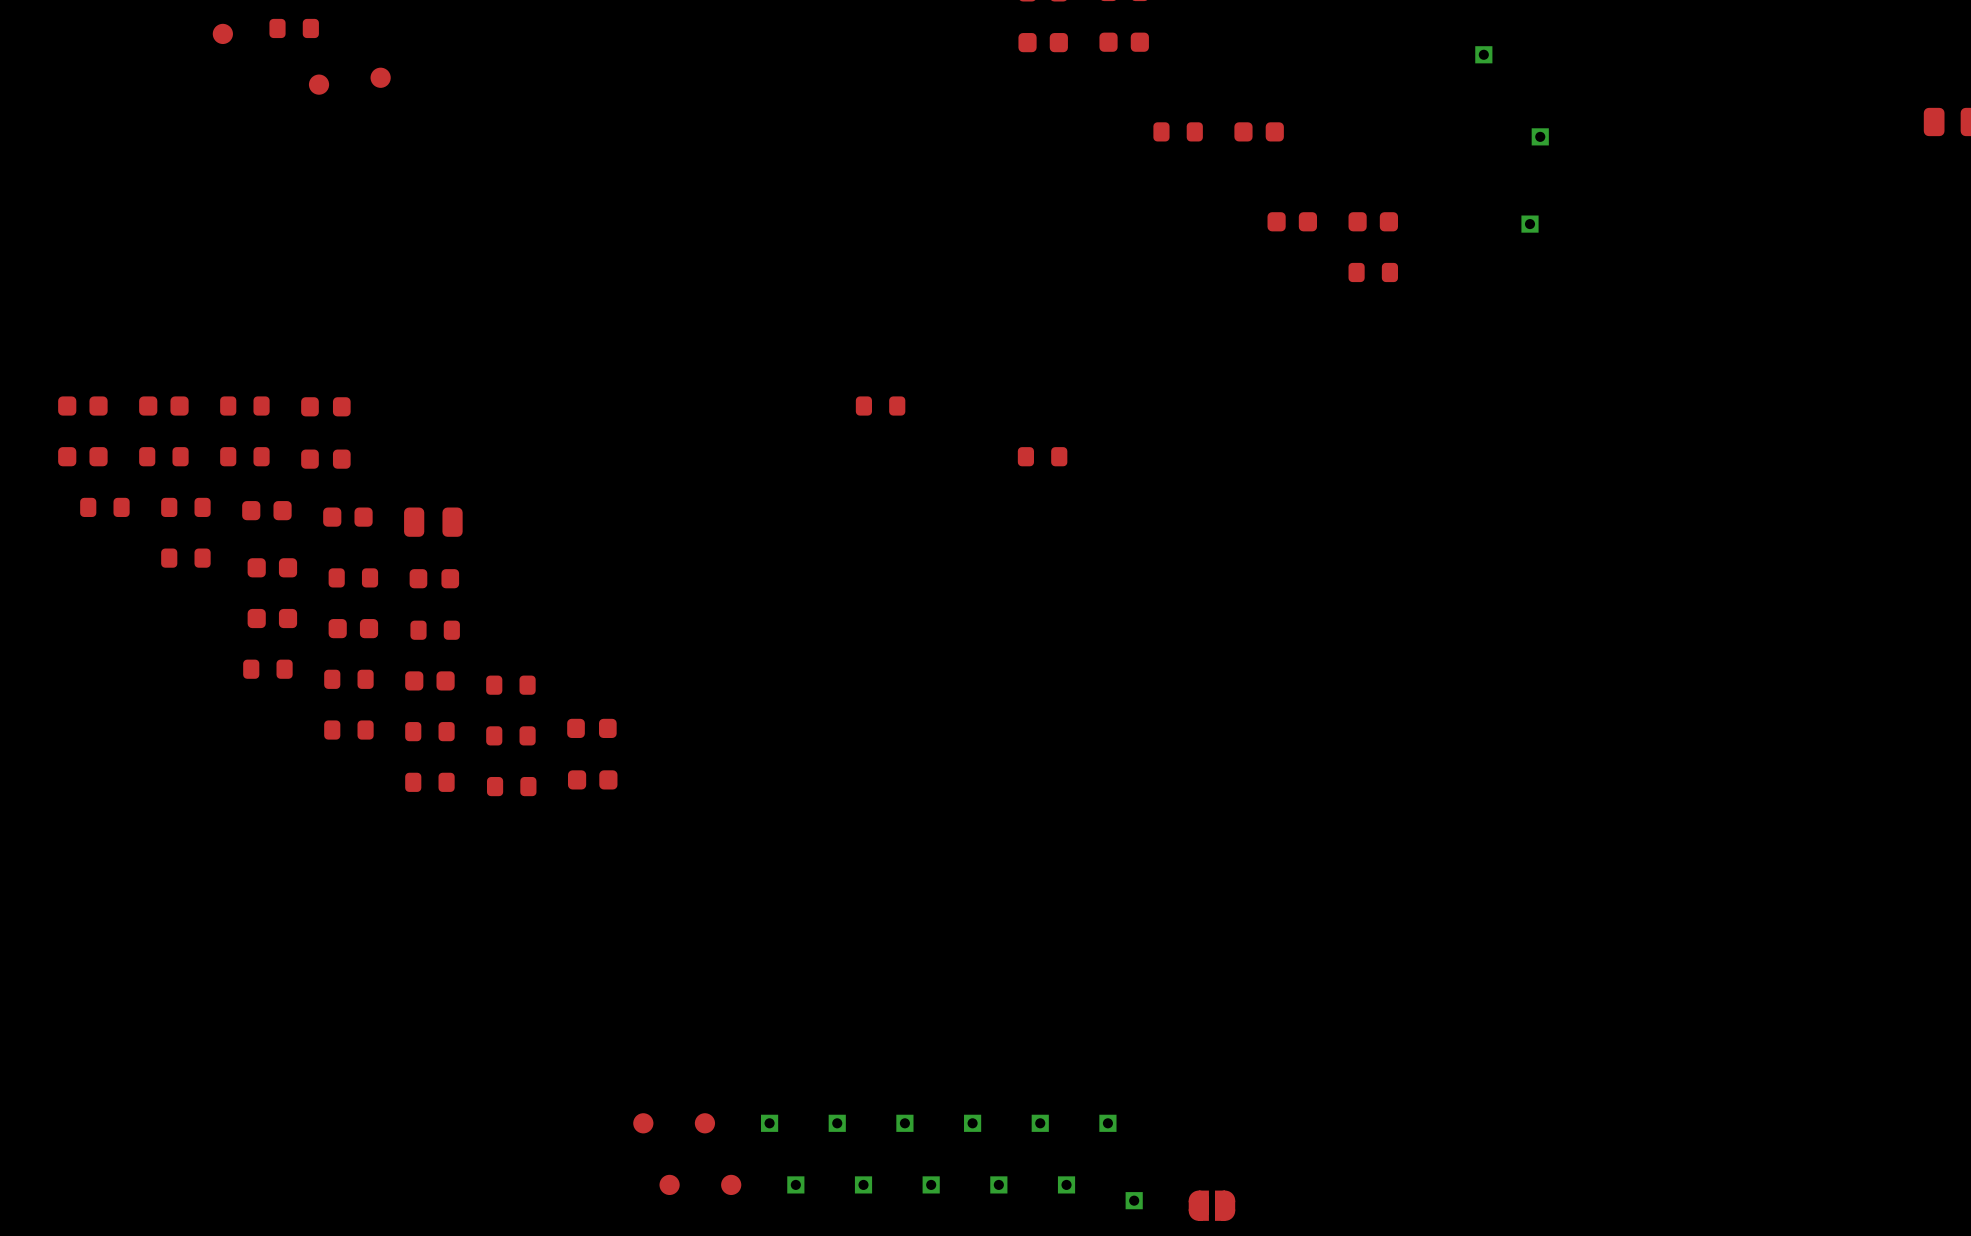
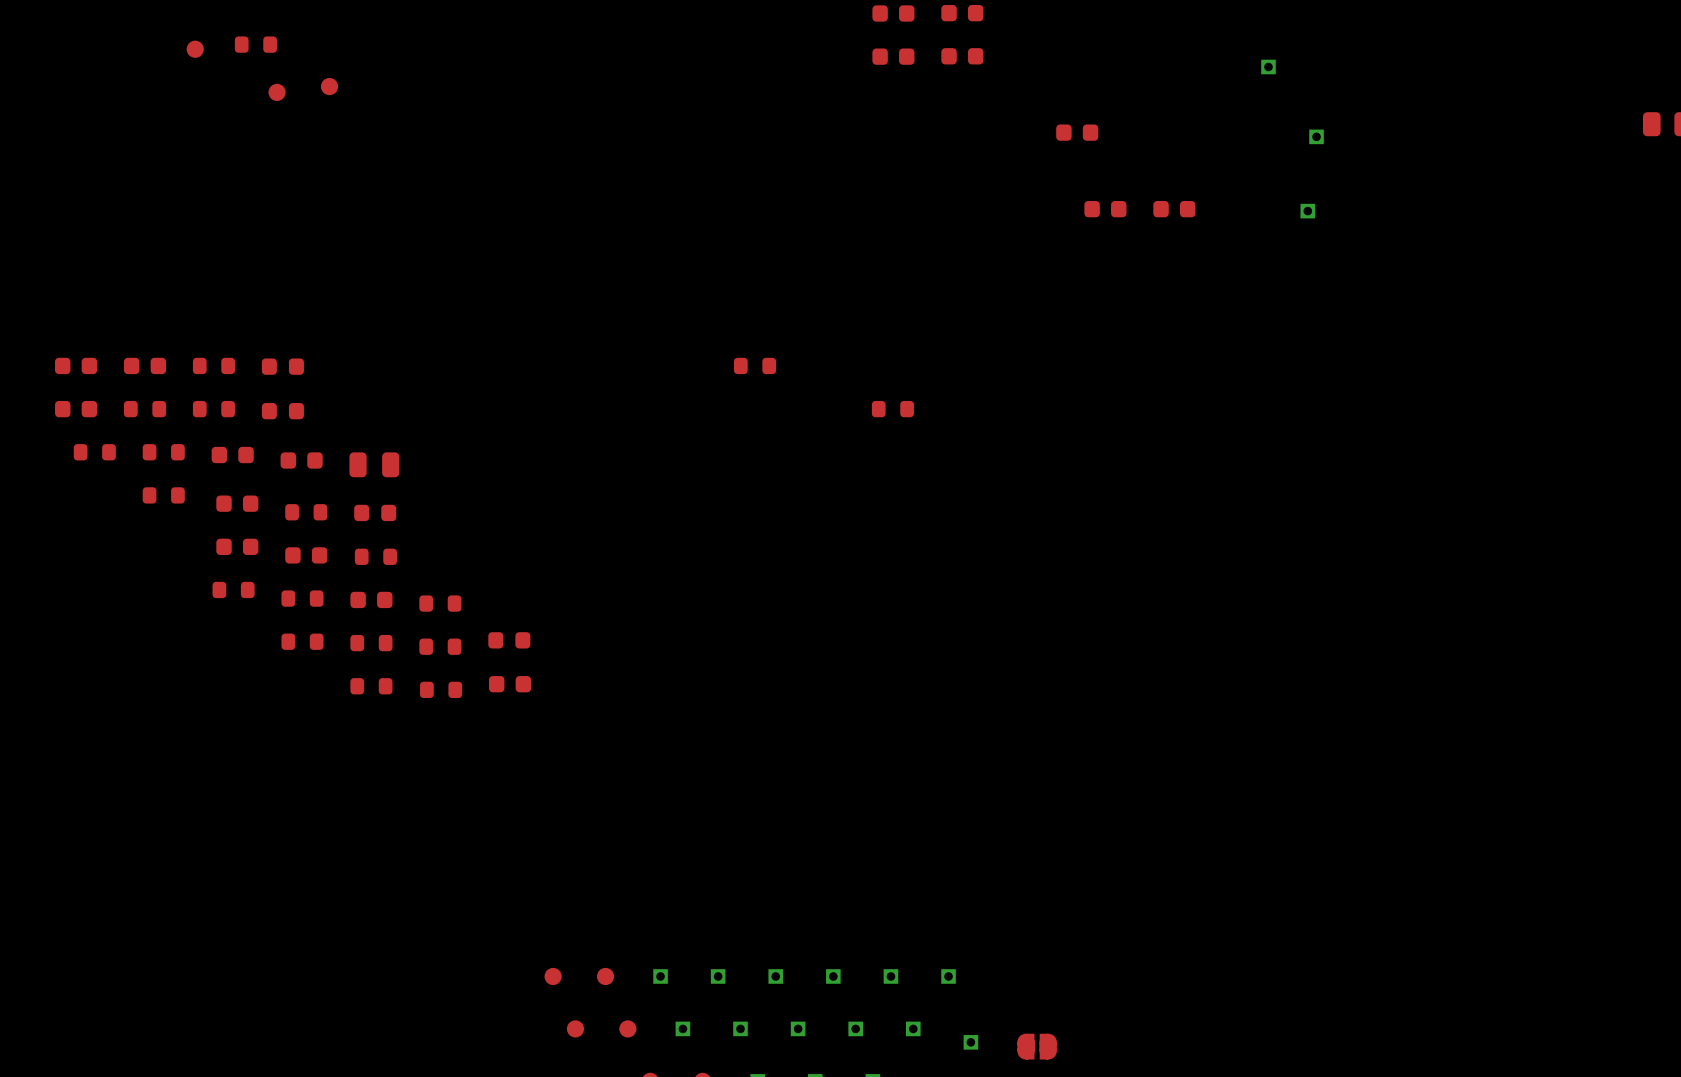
part: (1178, 131) -> none
part: (1373, 272) -> none

